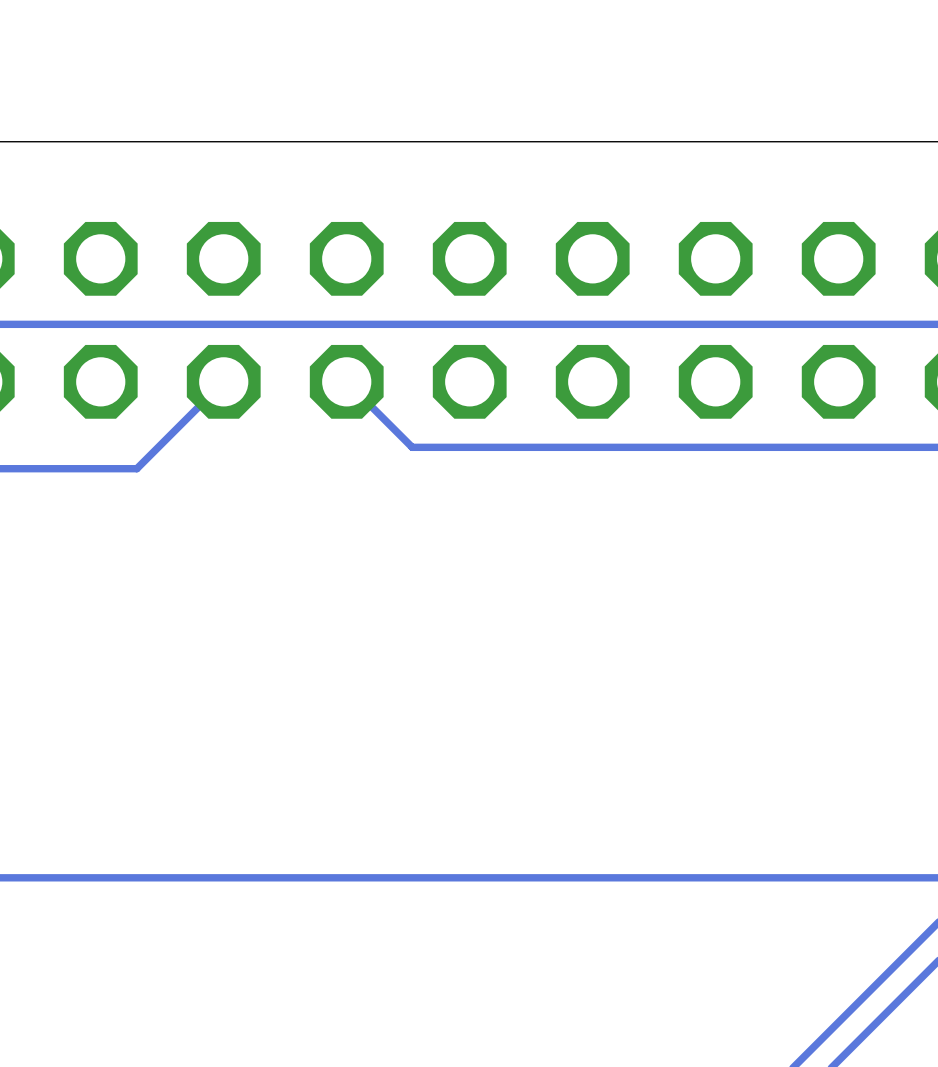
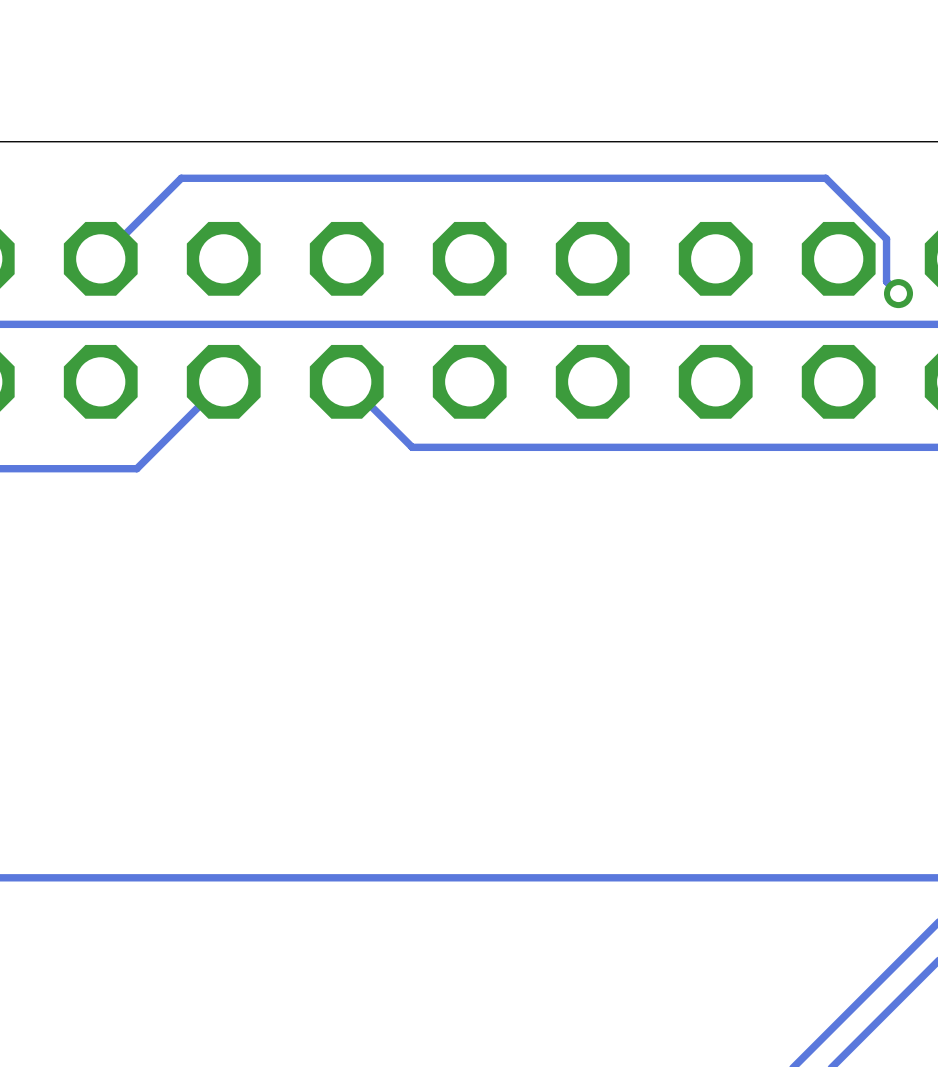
track: none -> (100, 258) (181, 178) (825, 178) (886, 239) (886, 281) (898, 293)
via: none -> (898, 293)

